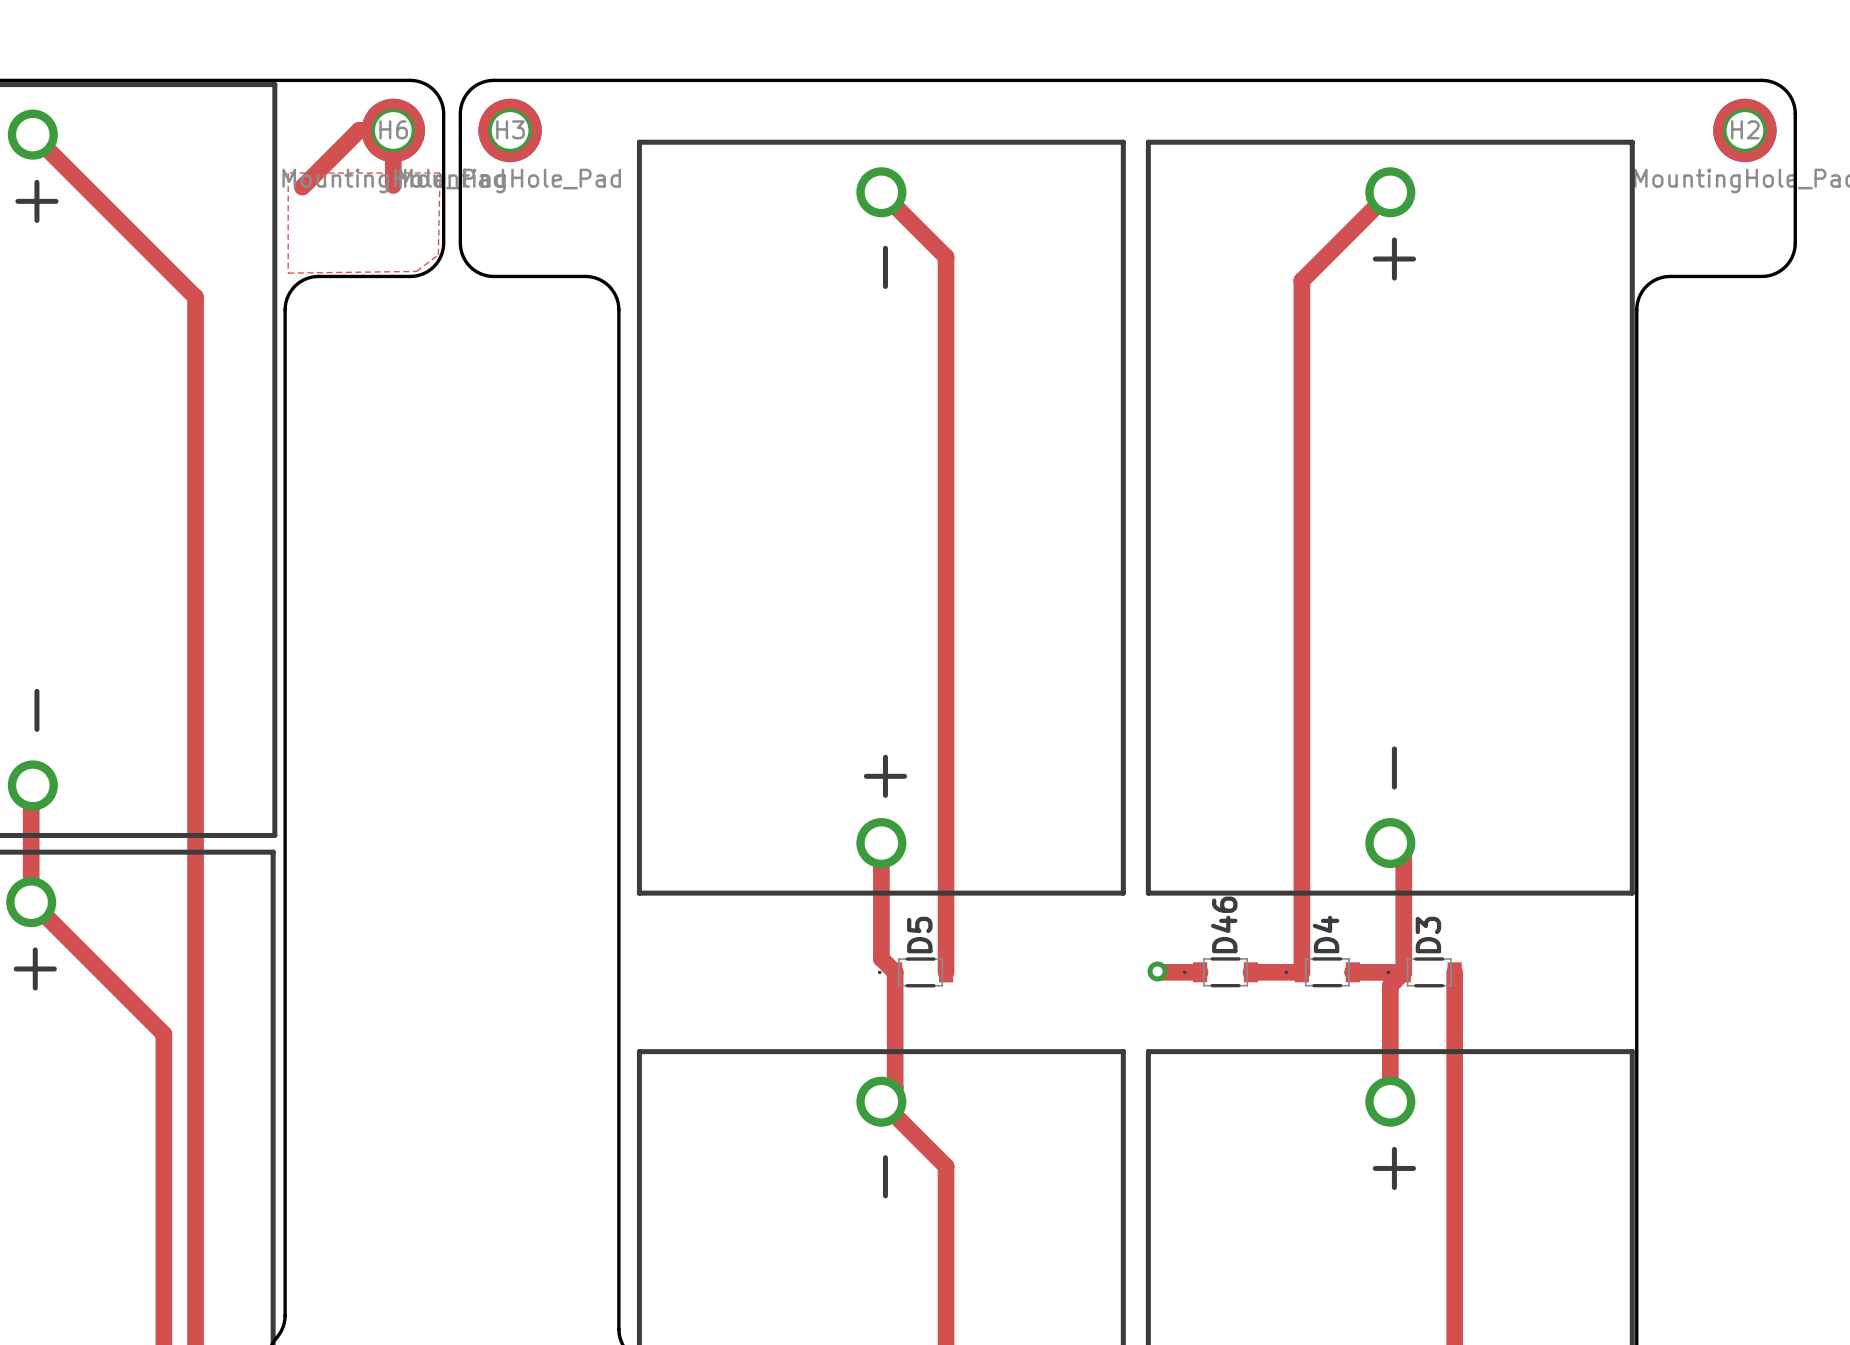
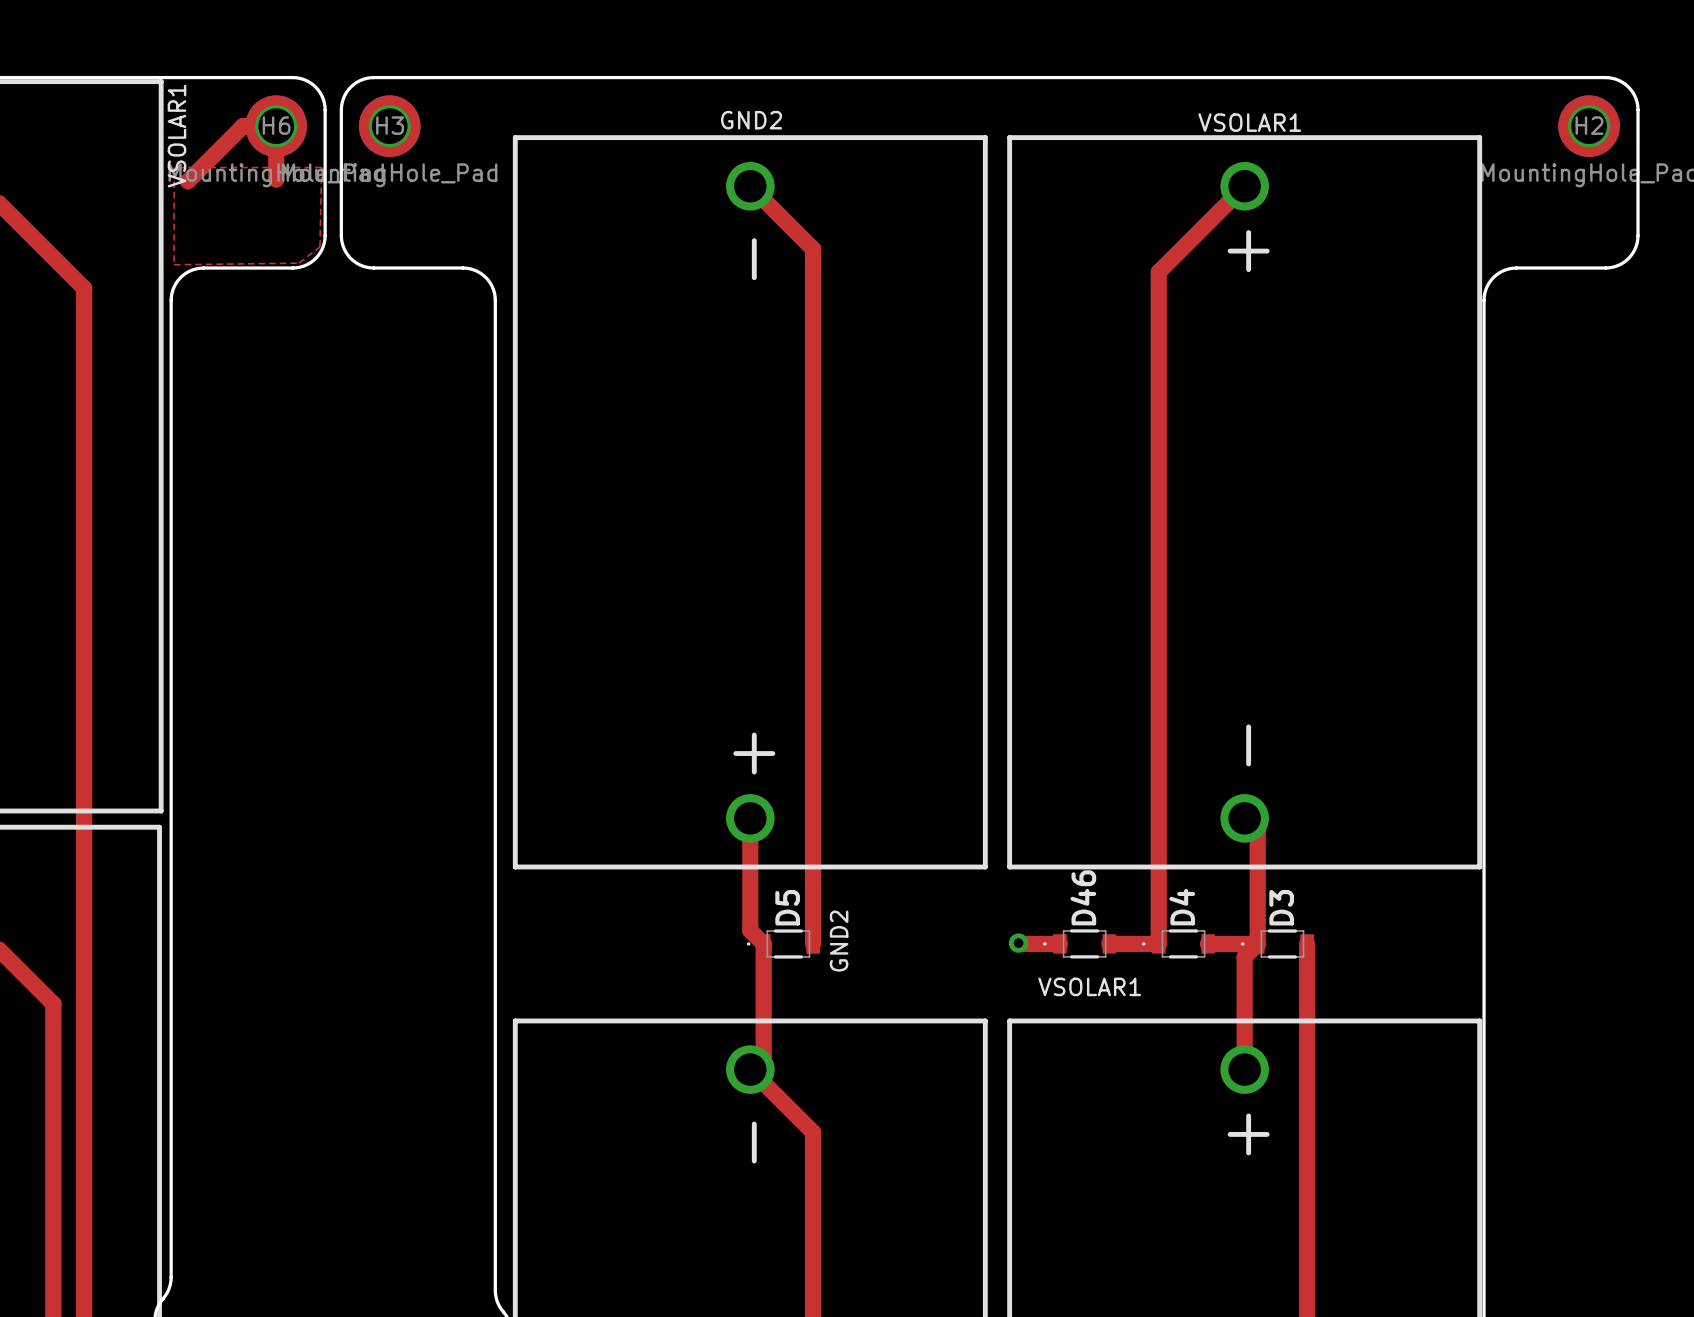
text: none -> GND2 (751, 120)
text: none -> VSOLAR1 (1249, 122)
text: none -> VSOLAR1 (176, 136)
text: none -> GND2 (839, 941)
text: none -> VSOLAR1 (1089, 986)

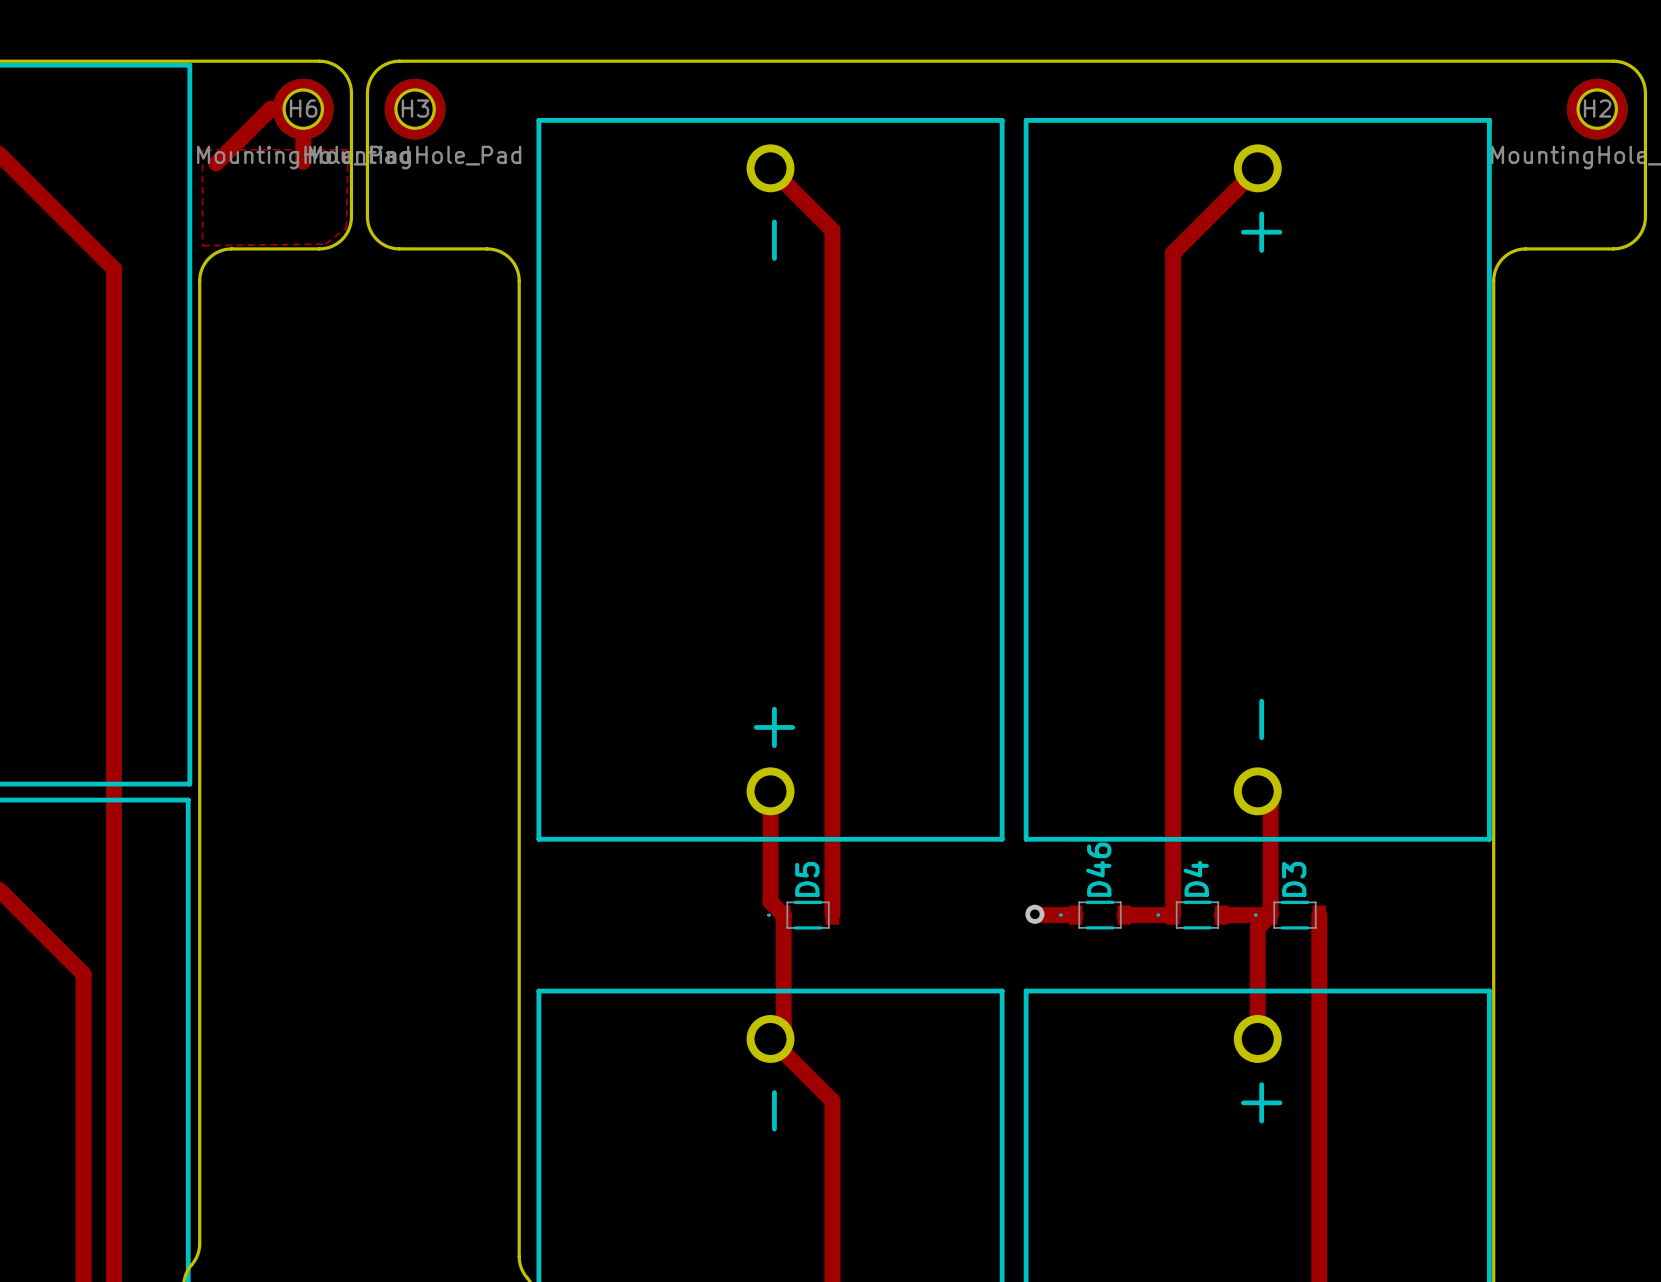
text: GND2 (751, 120) -> none
text: VSOLAR1 (1249, 122) -> none
text: VSOLAR1 (176, 136) -> none
text: GND2 (839, 941) -> none
text: VSOLAR1 (1089, 986) -> none

